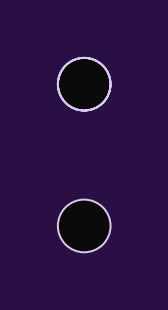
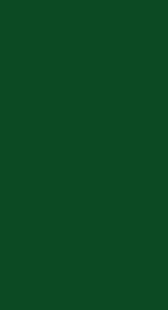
part: (84, 84) -> none
part: (84, 225) -> none

